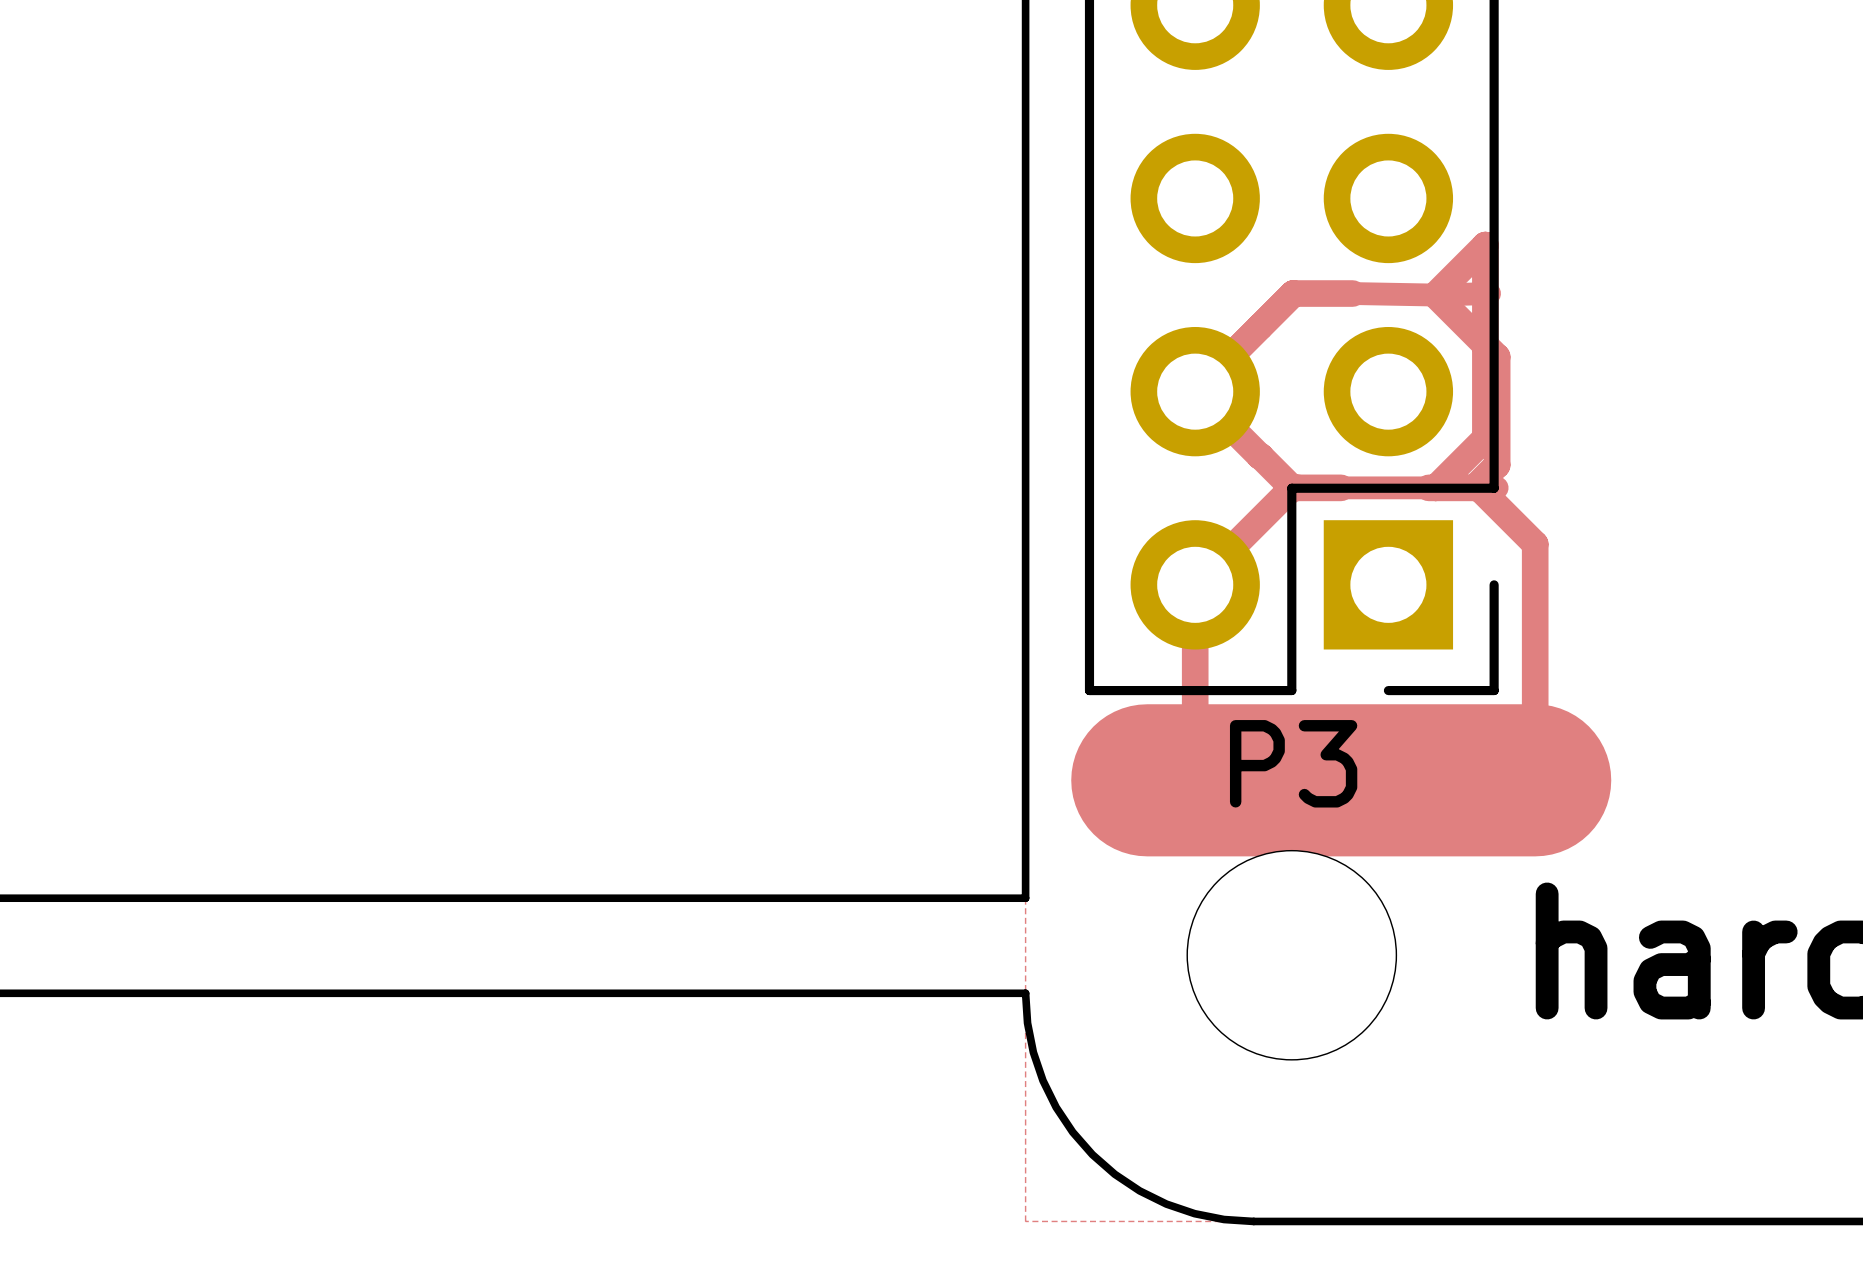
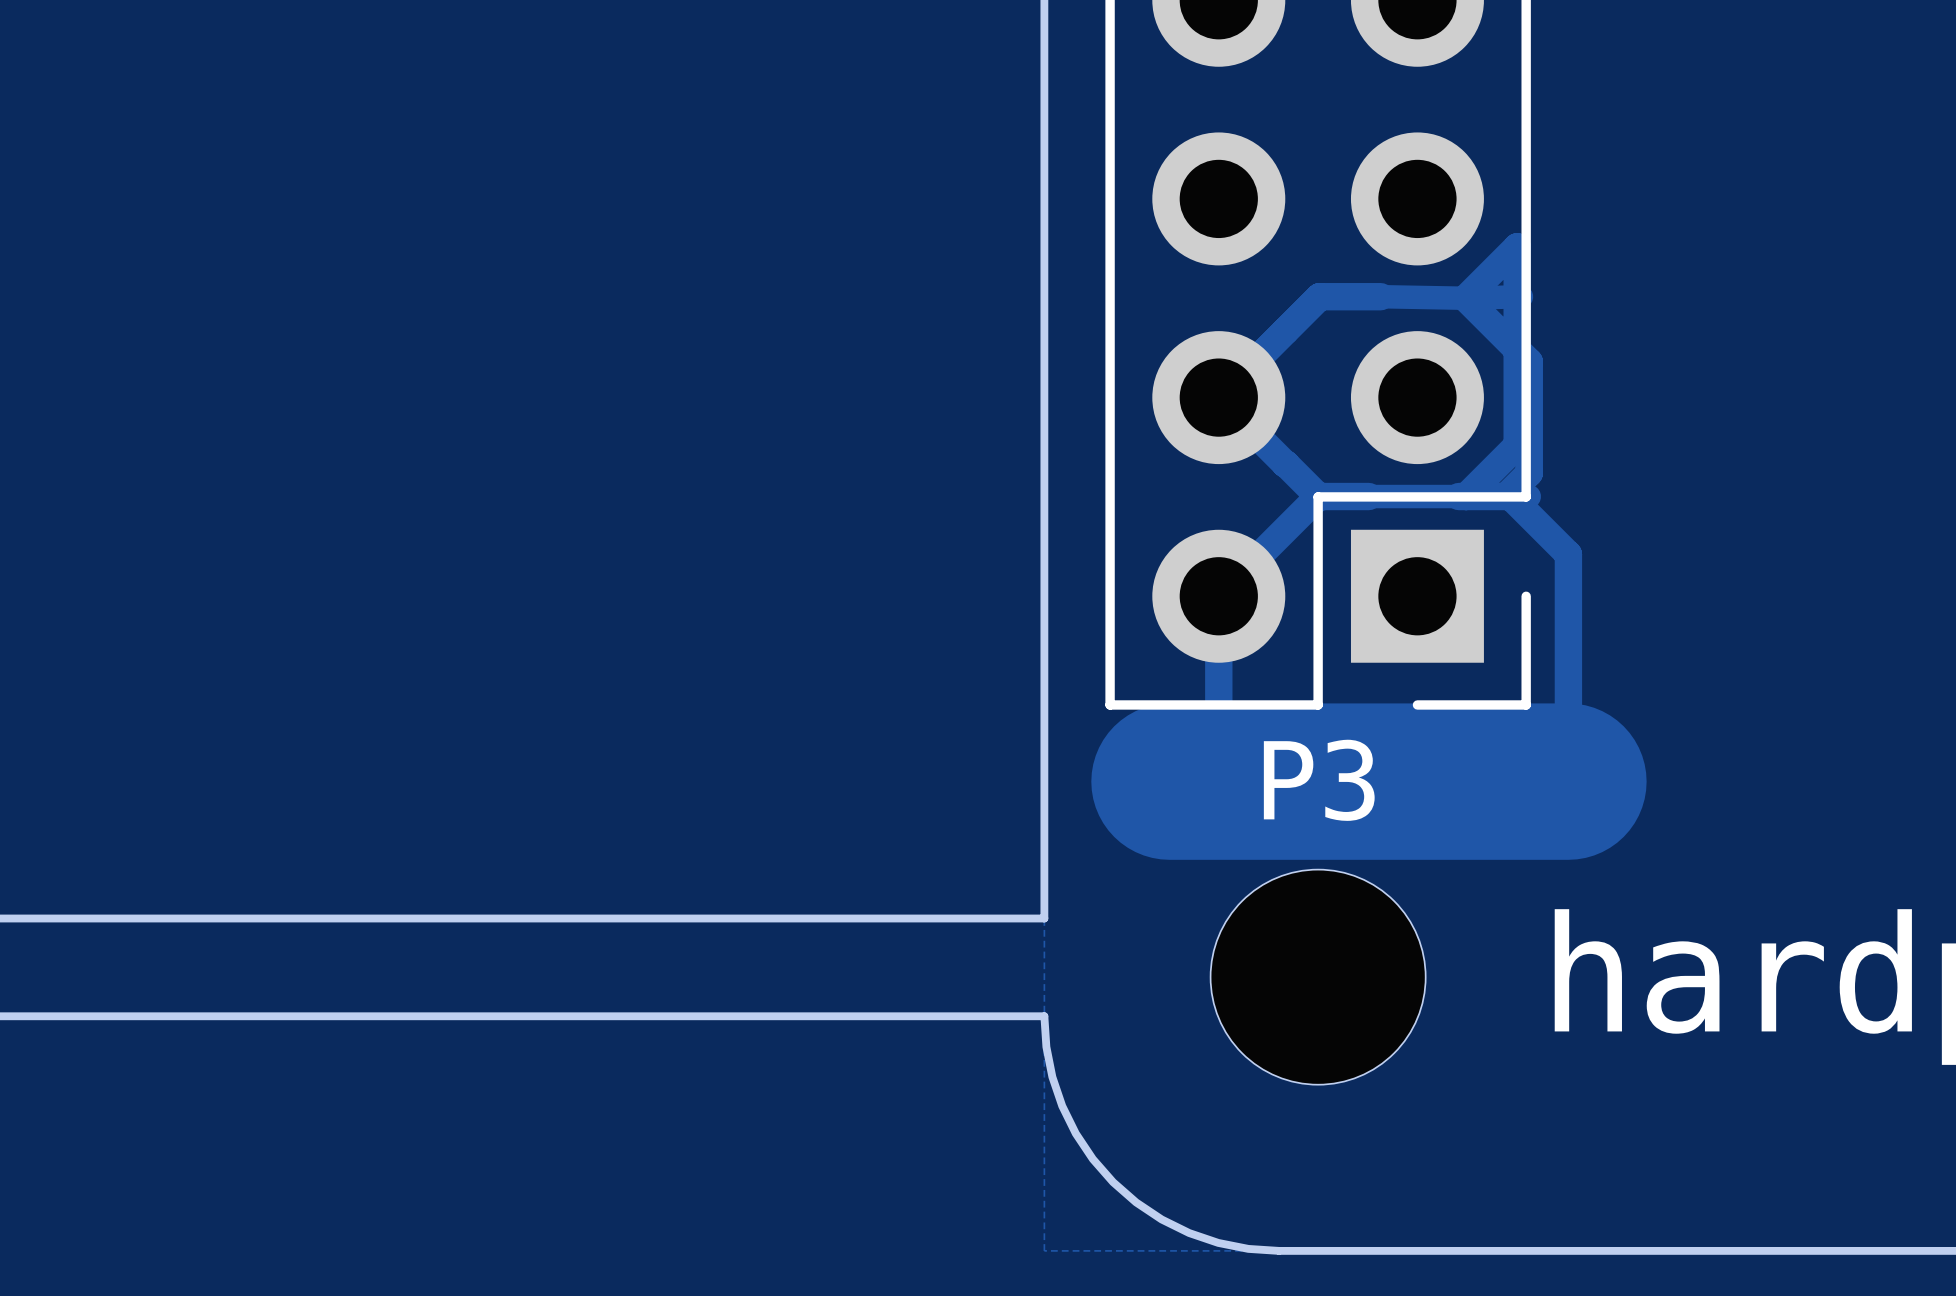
track: (1147, 780) (1535, 780) -> (1169, 781) (1568, 781)

